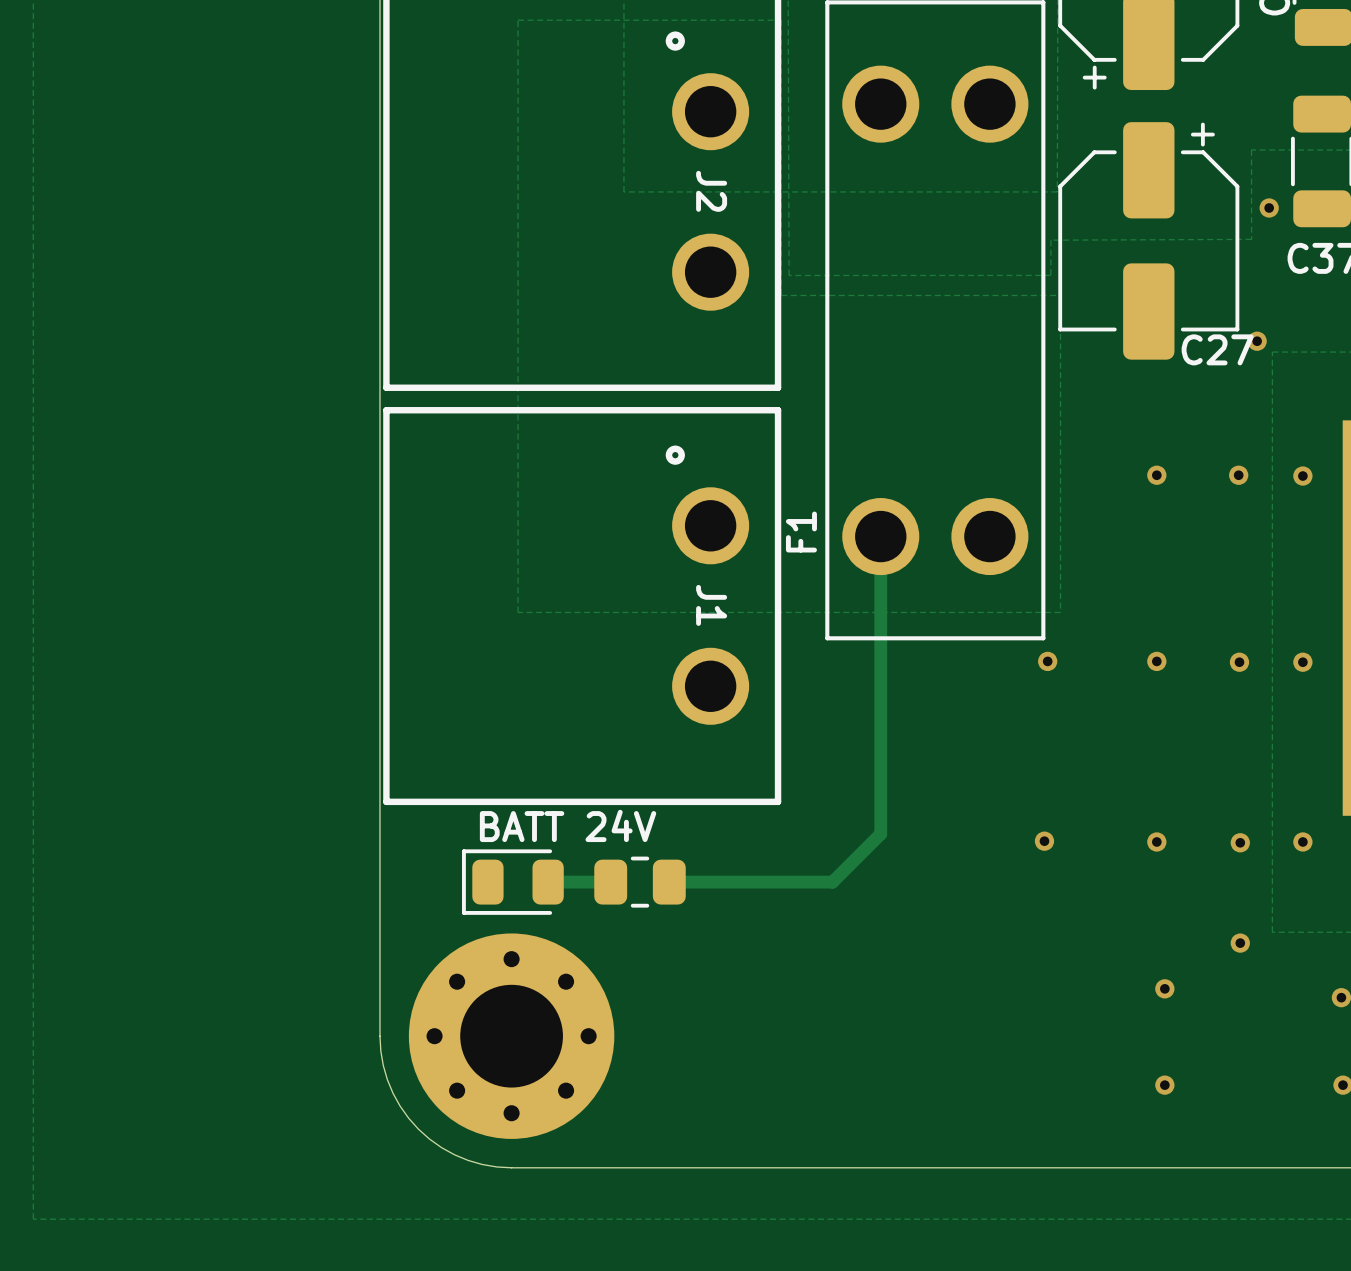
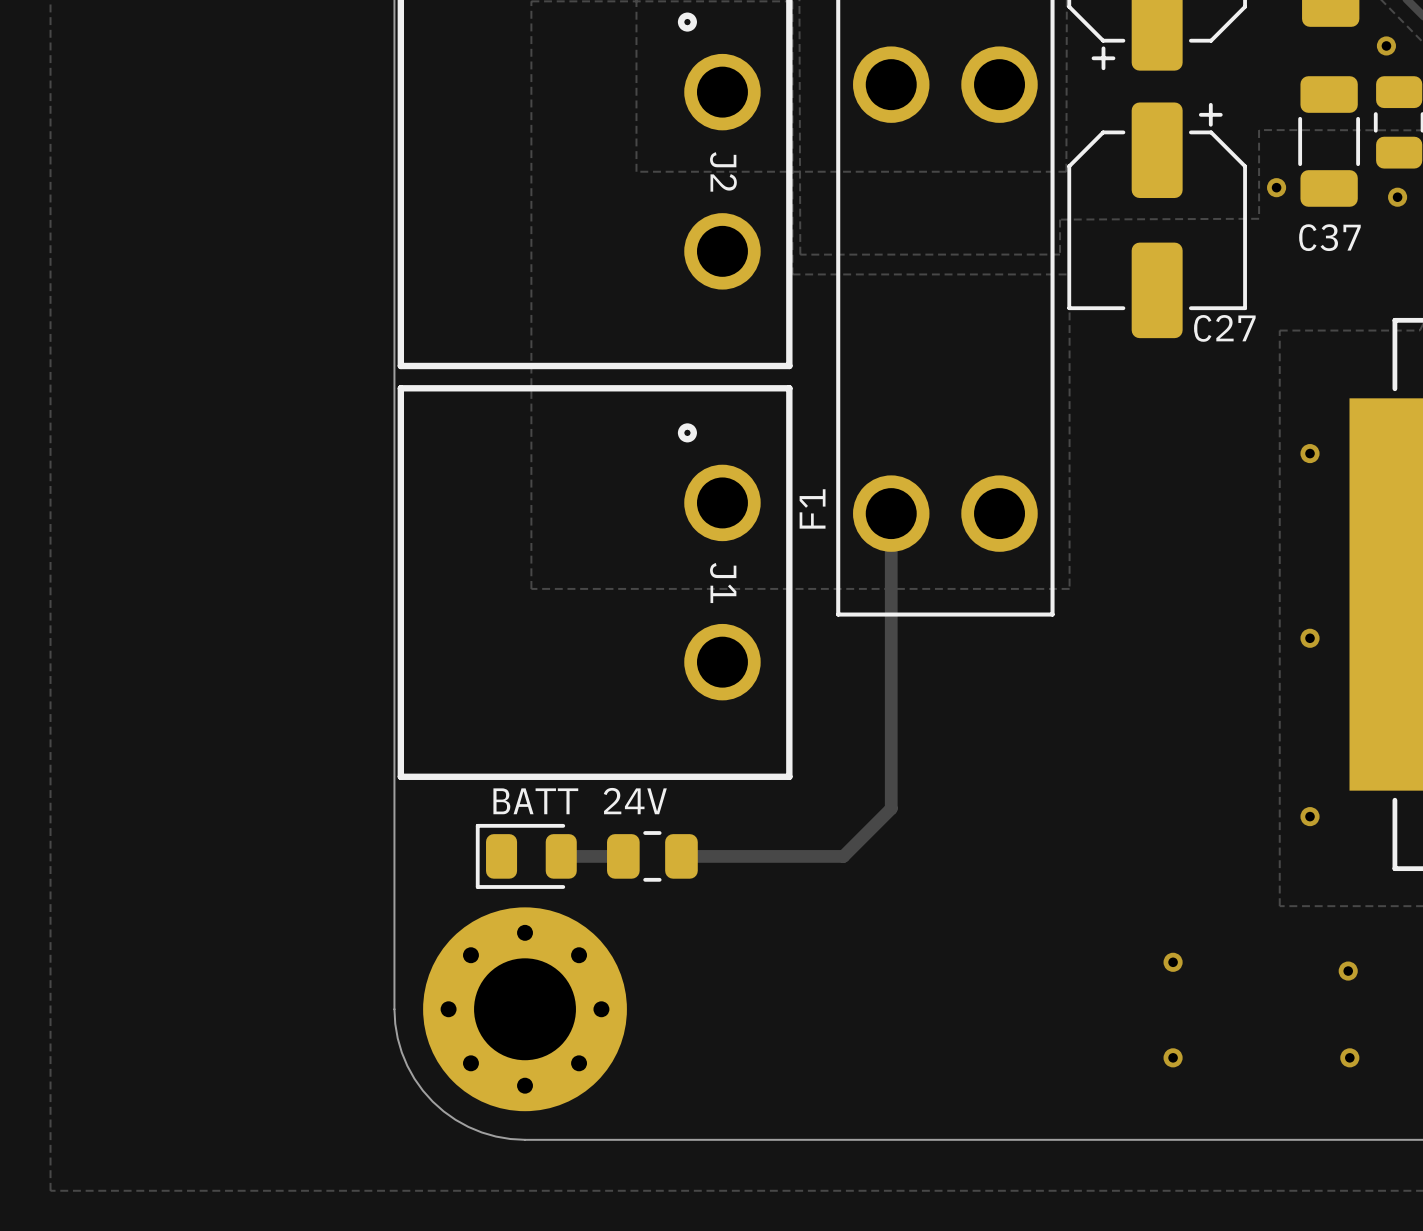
via: (1257, 341) -> none
via: (1156, 475) -> none
via: (1238, 475) -> none
via: (1047, 661) -> none
via: (1156, 661) -> none
via: (1239, 662) -> none
via: (1044, 841) -> none
via: (1156, 841) -> none
via: (1240, 842) -> none
via: (1240, 943) -> none

